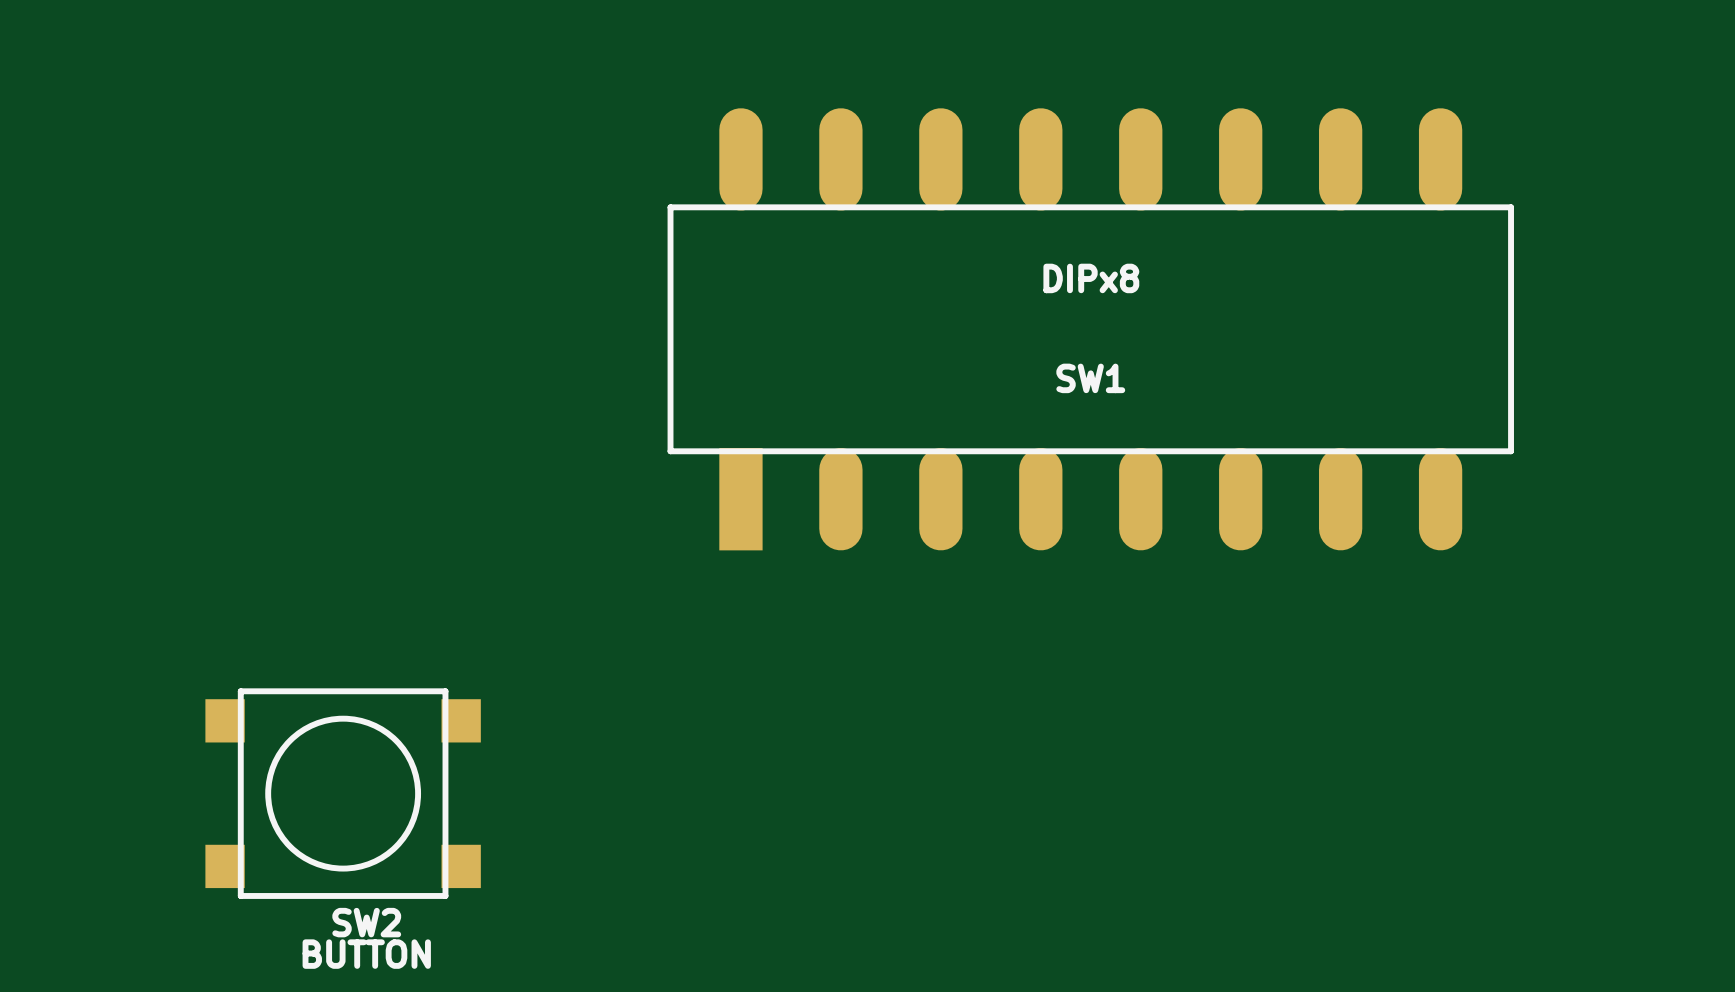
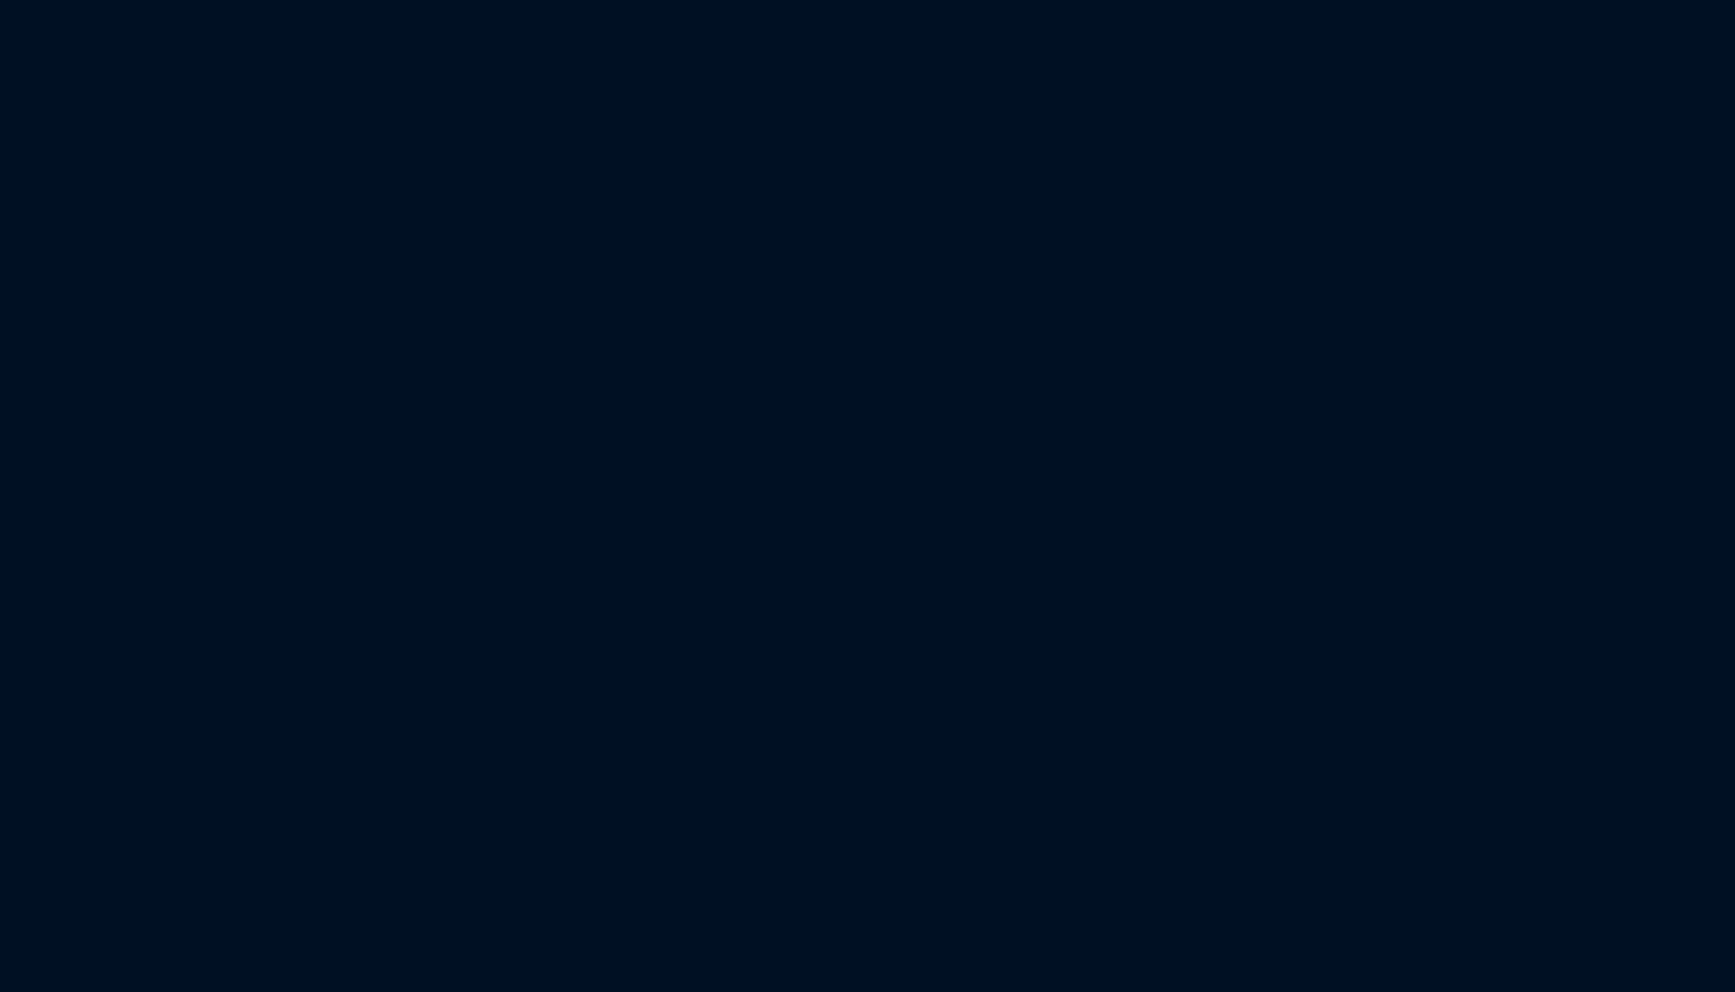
SW1: DIPx8 (1090, 329) -> none
SW2: BUTTON (343, 793) -> none

